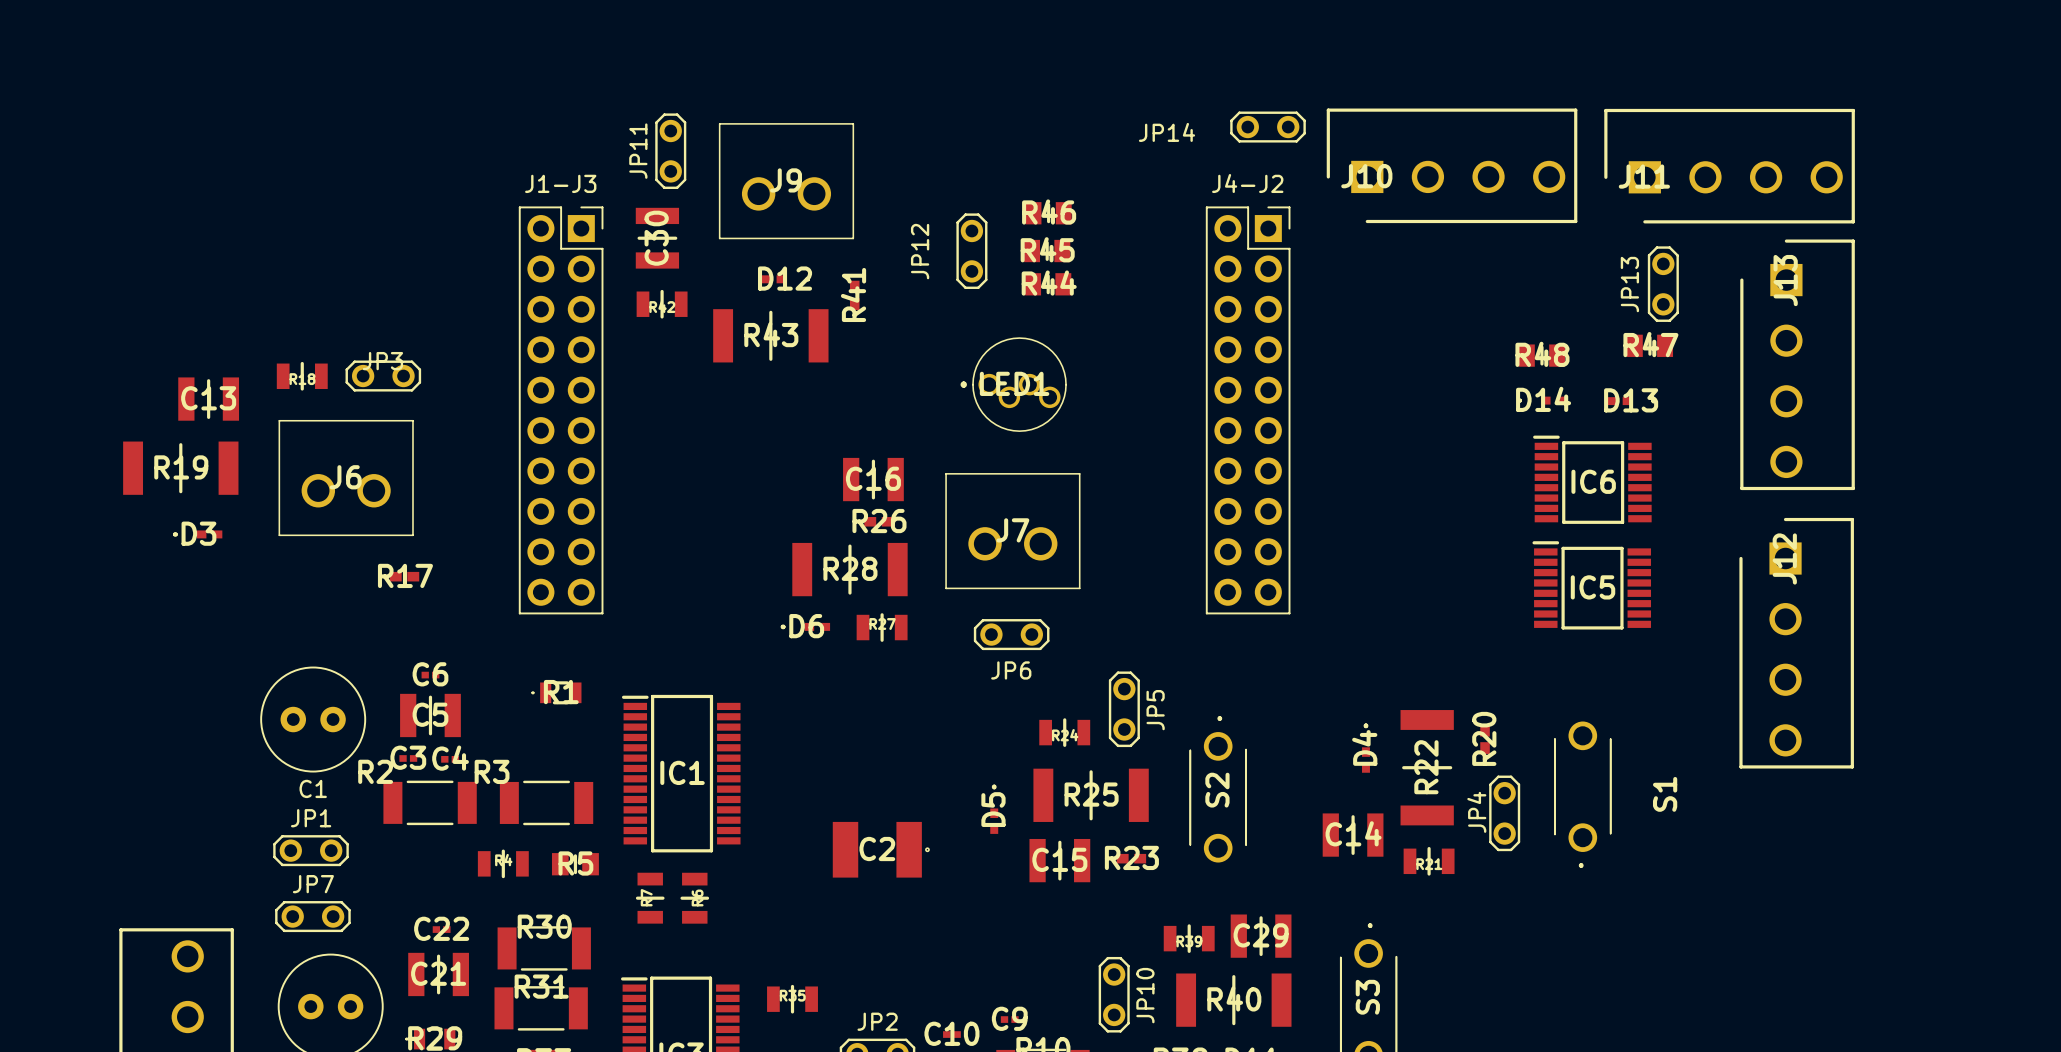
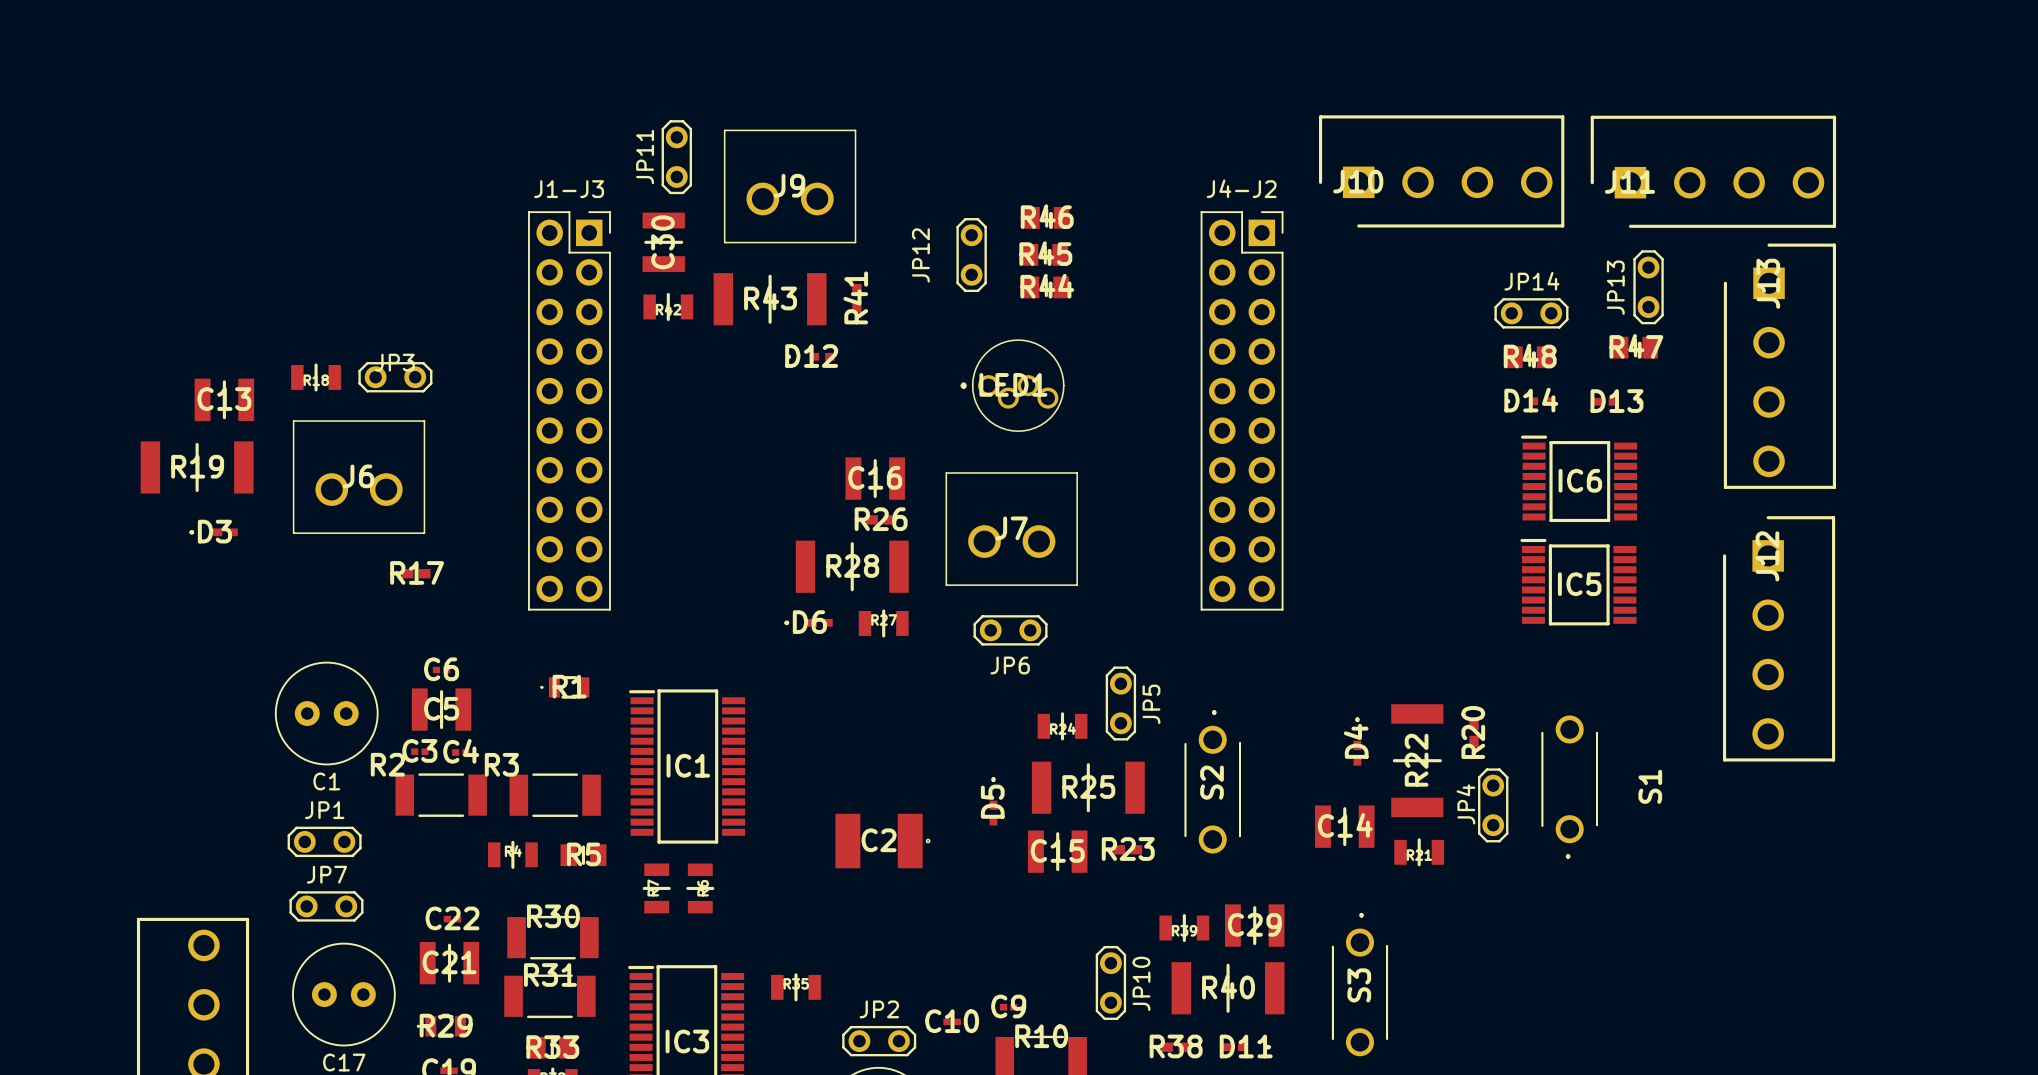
JP14 position: (1268, 127) -> (1531, 313)
JP14 name position: JP14 (1166, 132) -> JP14 (1531, 281)
D12 rotation: 0° (785, 279) -> 180° (810, 356)
D12 position: (785, 279) -> (810, 356)
R43 position: (770, 335) -> (770, 299)

